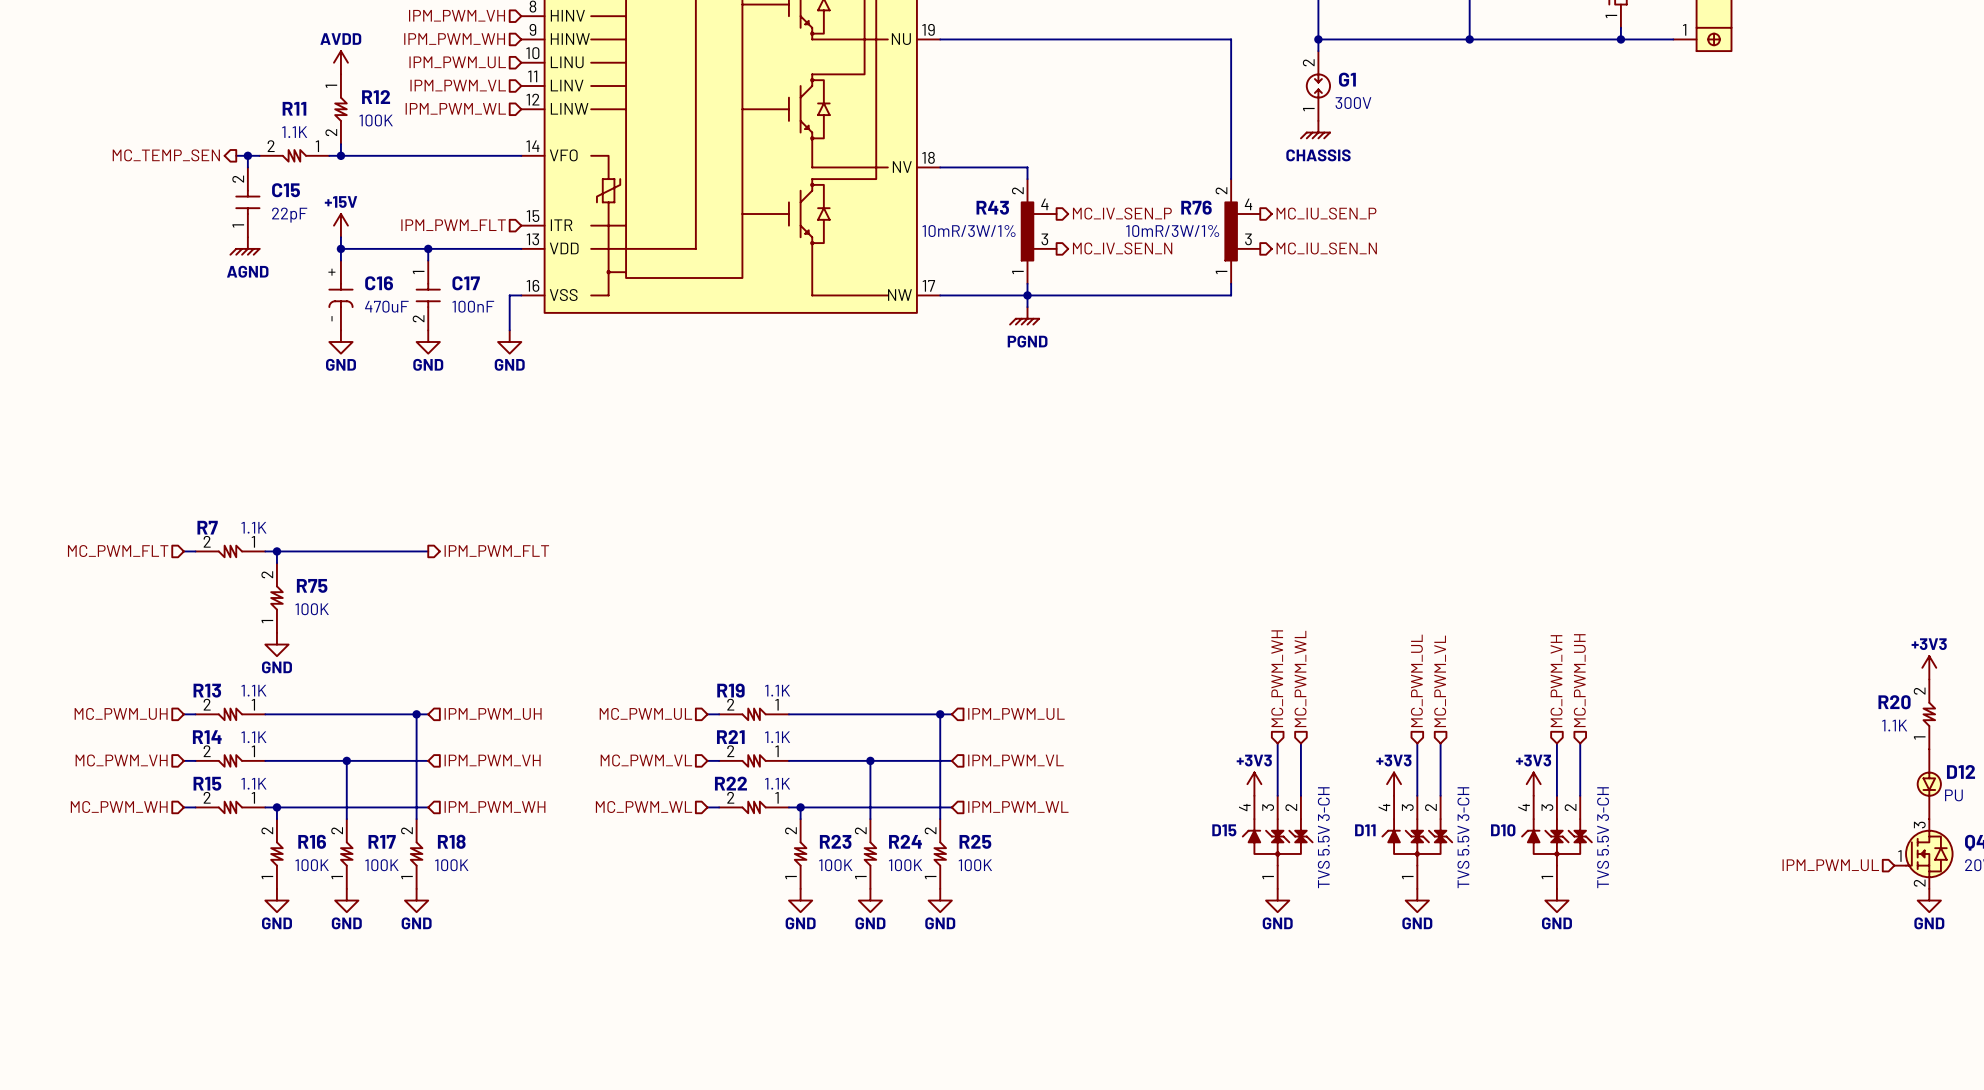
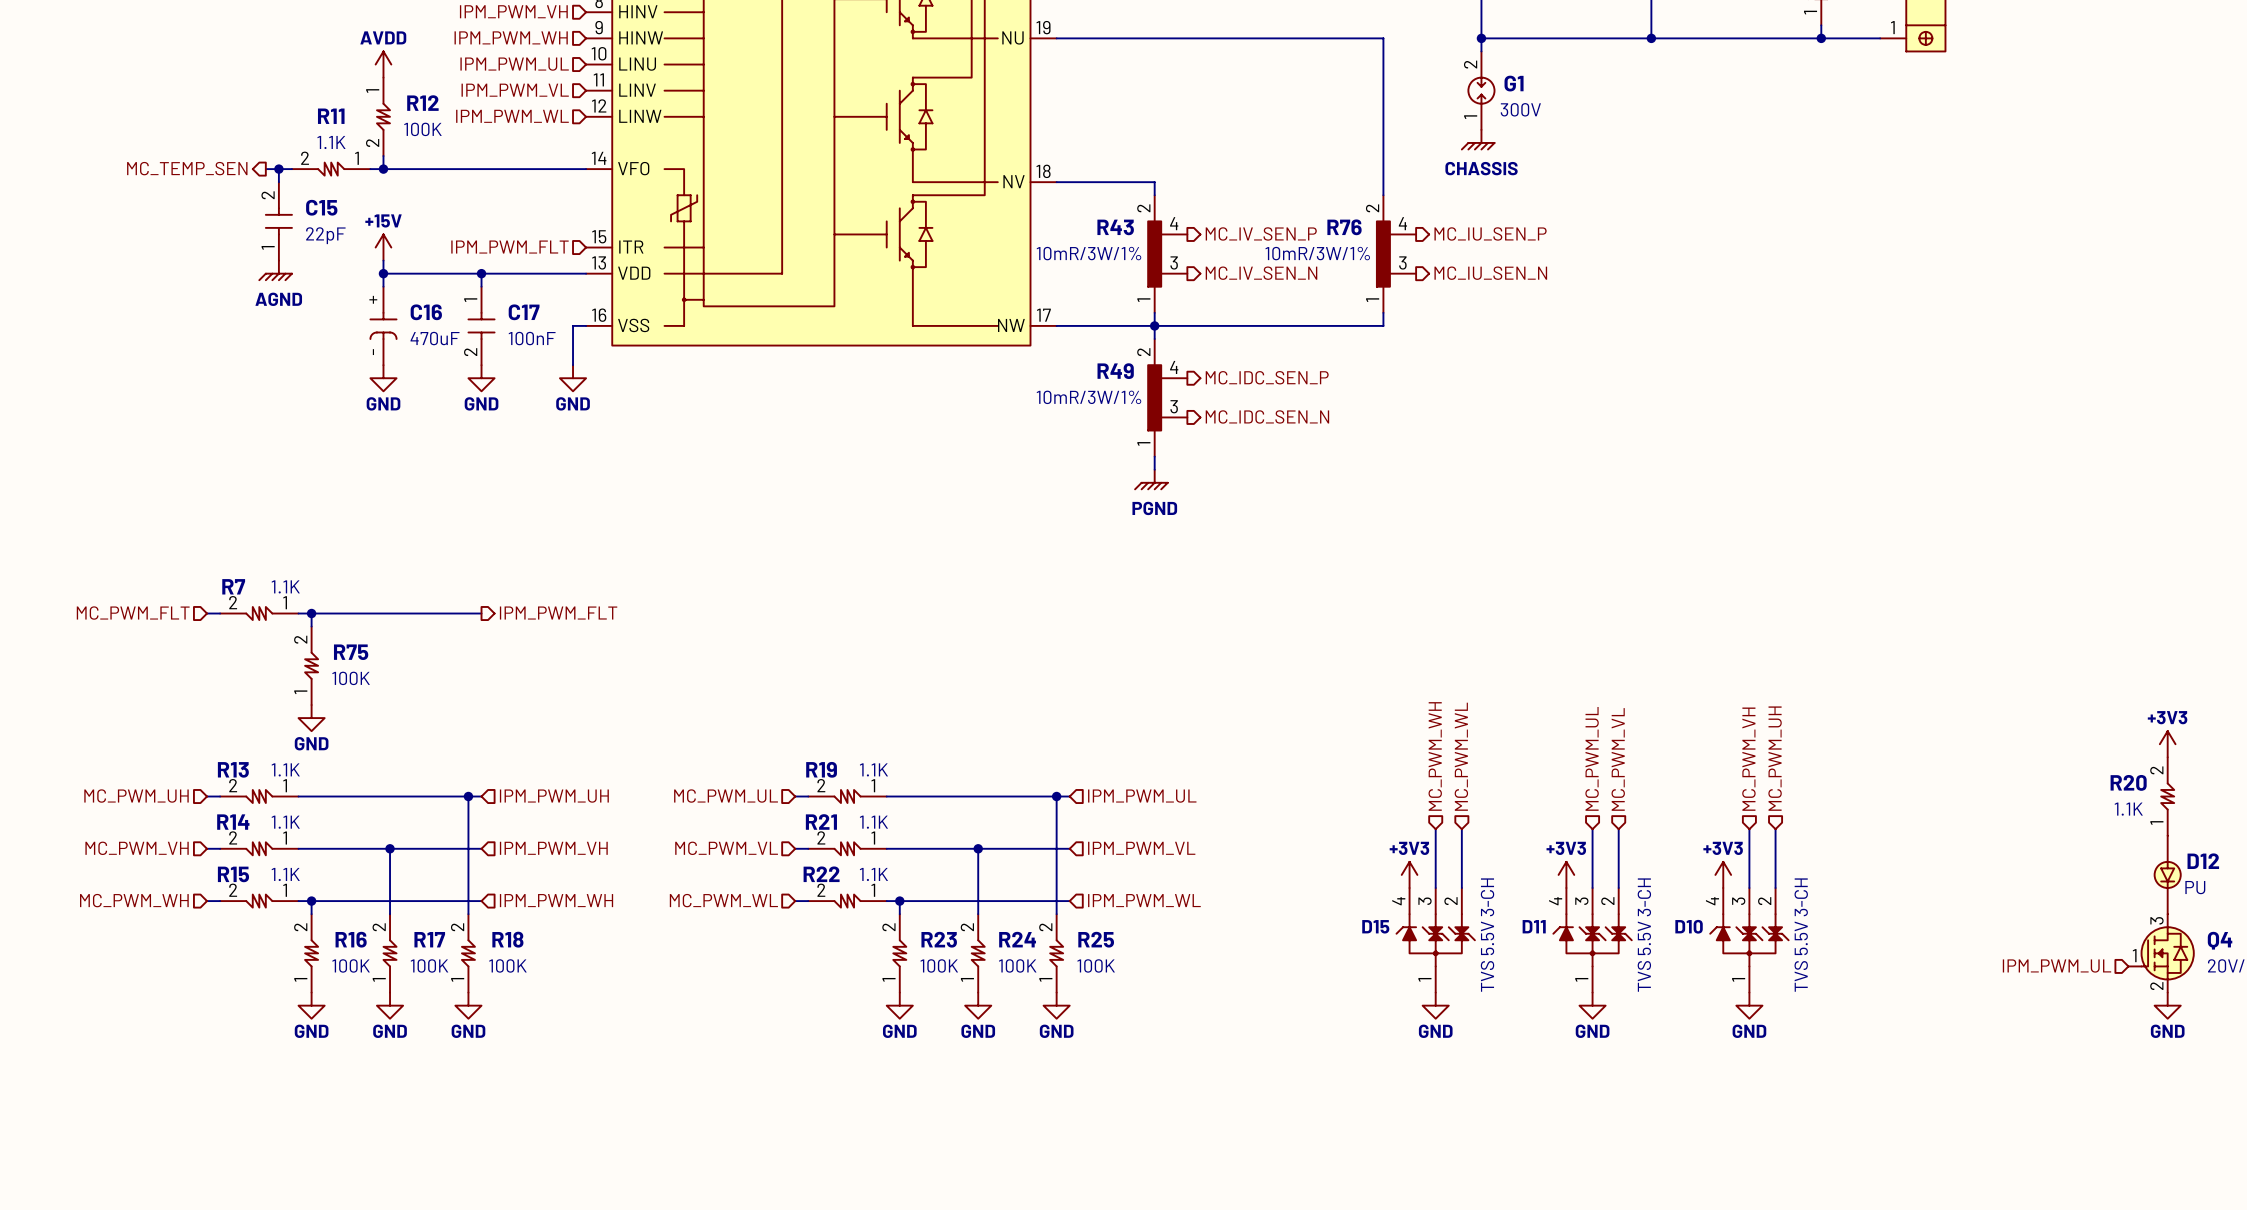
power symbol position: PGND (1024, 315) -> PGND (1151, 479)
hierarchical label: none -> MC_IDC_SEN_P (1267, 377)
R49: none -> 10mR/3W/1% (1167, 397)
hierarchical label: none -> MC_IDC_SEN_N (1267, 416)
wire: none -> (1154, 456) (1154, 469)

